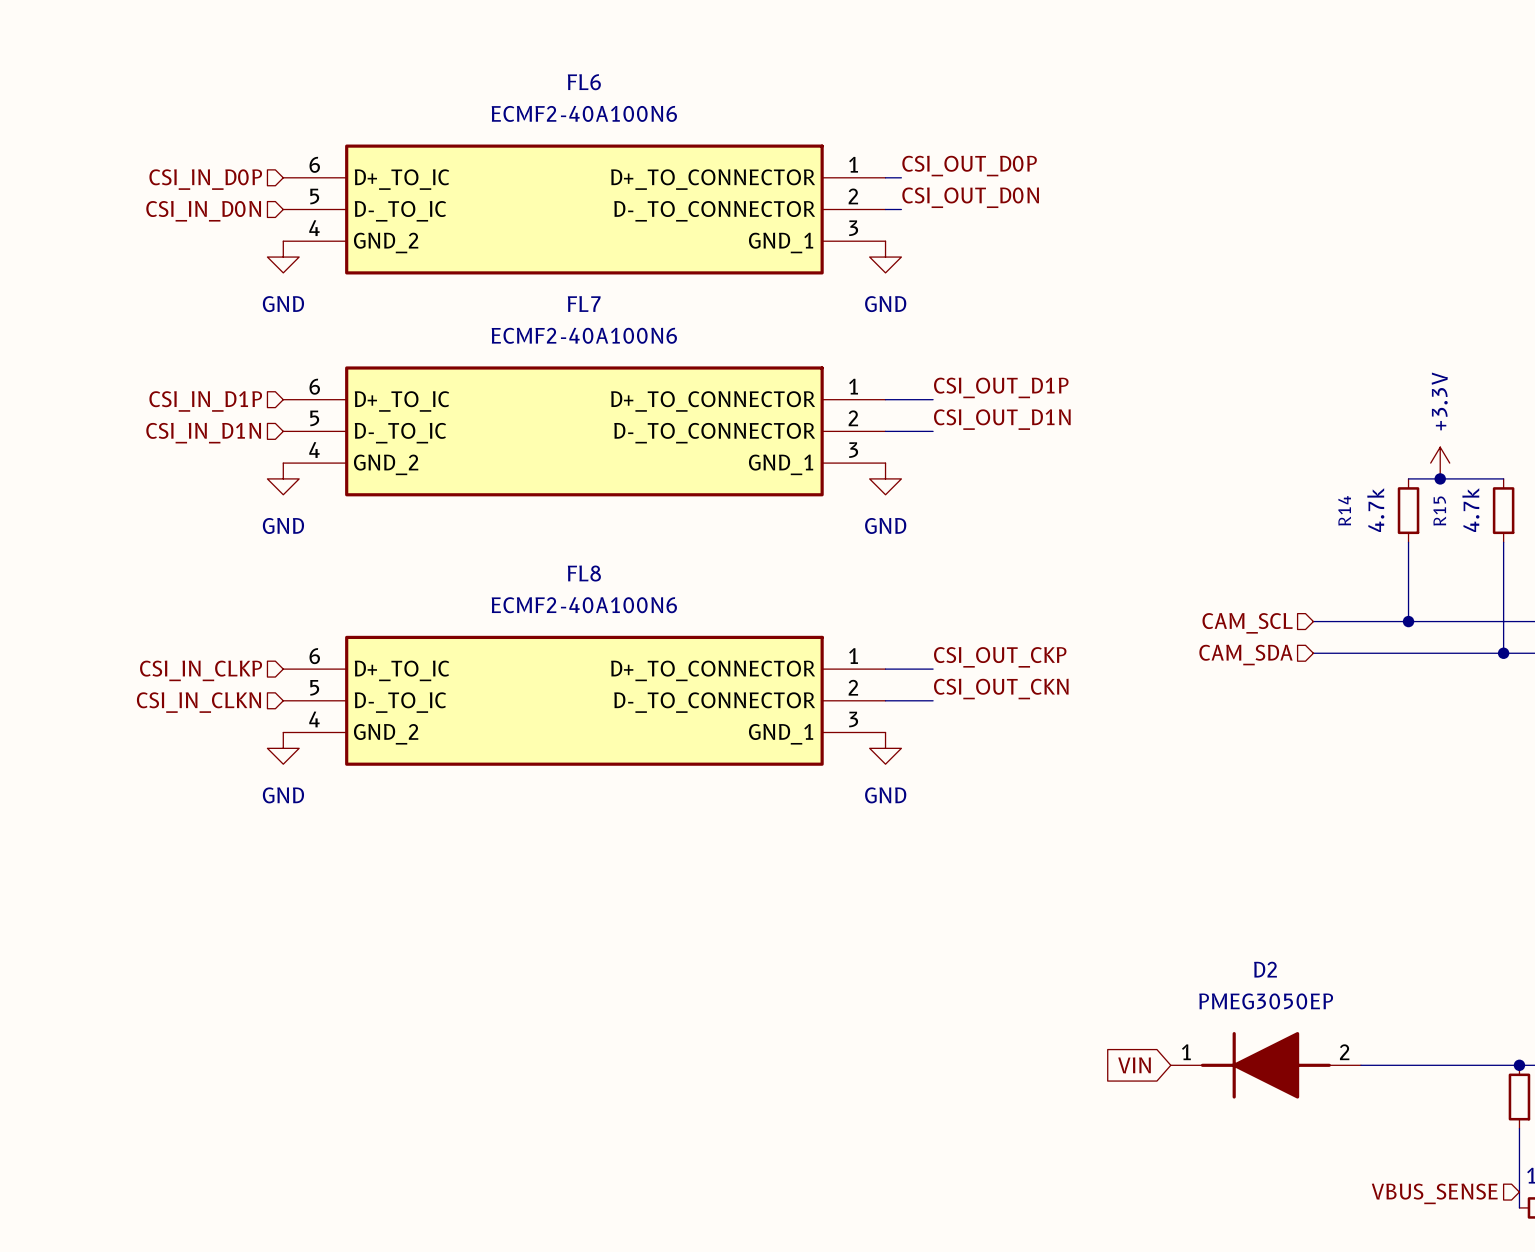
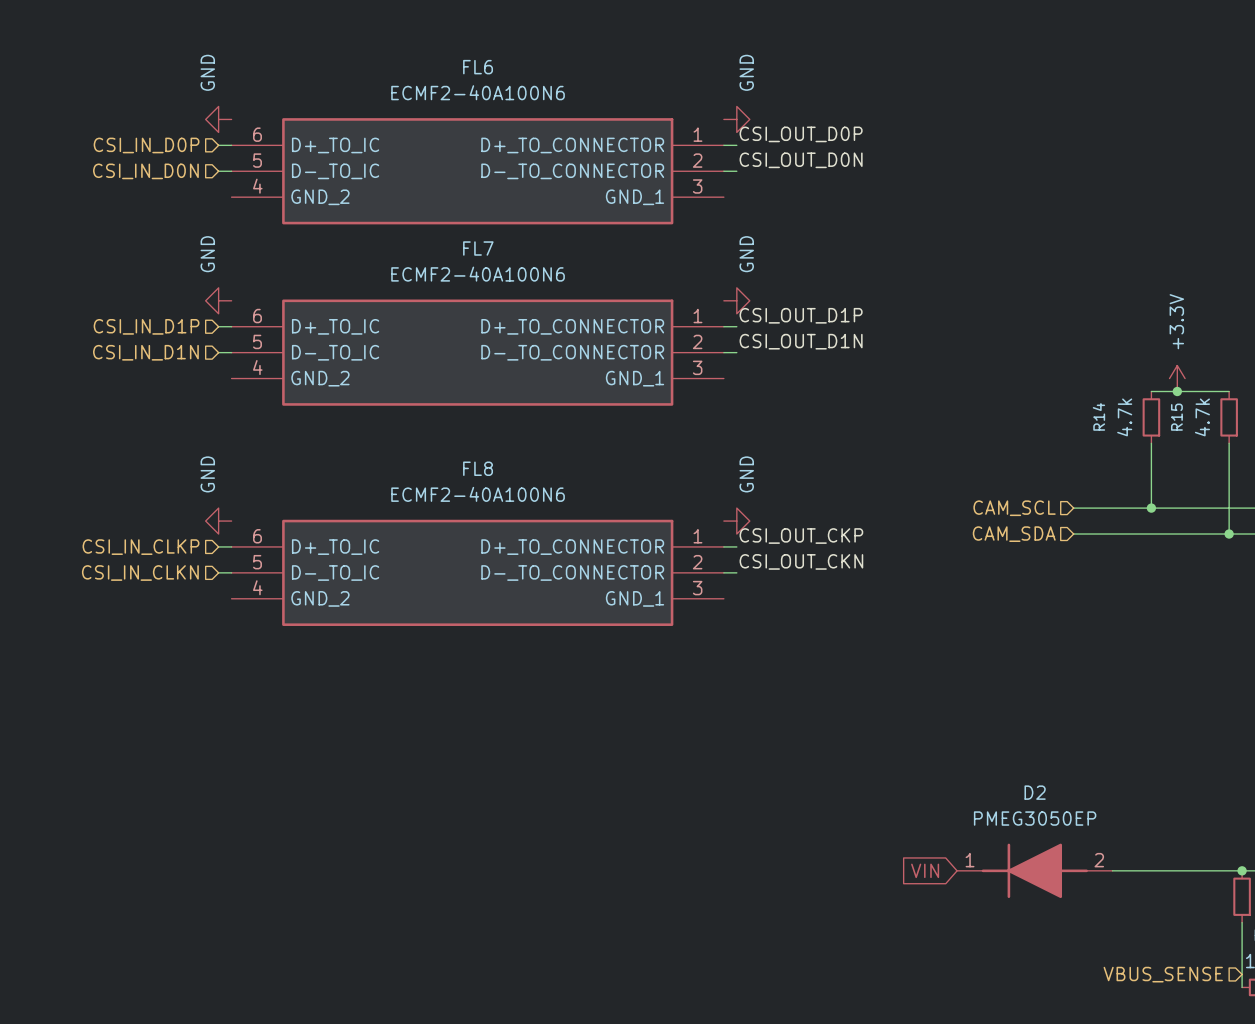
power symbol: none -> GND (218, 119)
power symbol: none -> GND (736, 119)
wire: none -> (218, 145) (231, 145)
hierarchical label position: CSI_IN_D0P (205, 179) -> CSI_IN_D0P (146, 145)
wire: none -> (218, 171) (231, 171)
hierarchical label position: CSI_IN_D0N (203, 211) -> CSI_IN_D0N (145, 171)
power symbol: GND (283, 257) -> none
power symbol: GND (885, 257) -> none
power symbol: none -> GND (218, 300)
power symbol: none -> GND (736, 300)
label position: CSI_OUT_D1P (1001, 387) -> CSI_OUT_D1P (801, 315)
wire: none -> (218, 326) (231, 326)
wire: (901, 399) (933, 399) -> none
hierarchical label position: CSI_IN_D1P (205, 401) -> CSI_IN_D1P (146, 326)
label position: CSI_OUT_D1N (1002, 419) -> CSI_OUT_D1N (801, 341)
wire: none -> (218, 352) (231, 352)
wire: (901, 431) (933, 431) -> none
hierarchical label position: CSI_IN_D1N (203, 433) -> CSI_IN_D1N (145, 352)
power symbol: GND (283, 478) -> none
power symbol: GND (885, 478) -> none
power symbol: none -> GND (218, 521)
power symbol: none -> GND (736, 521)
label position: CSI_OUT_CKP (1000, 657) -> CSI_OUT_CKP (801, 536)
wire: none -> (218, 546) (231, 546)
wire: (901, 669) (933, 669) -> none
hierarchical label position: CSI_IN_CLKP (201, 670) -> CSI_IN_CLKP (141, 547)
label position: CSI_OUT_CKN (1001, 689) -> CSI_OUT_CKN (801, 561)
wire: none -> (218, 572) (231, 572)
wire: (901, 700) (933, 700) -> none
hierarchical label position: CSI_IN_CLKN (198, 702) -> CSI_IN_CLKN (140, 573)
power symbol: GND (283, 748) -> none
power symbol: GND (885, 748) -> none

